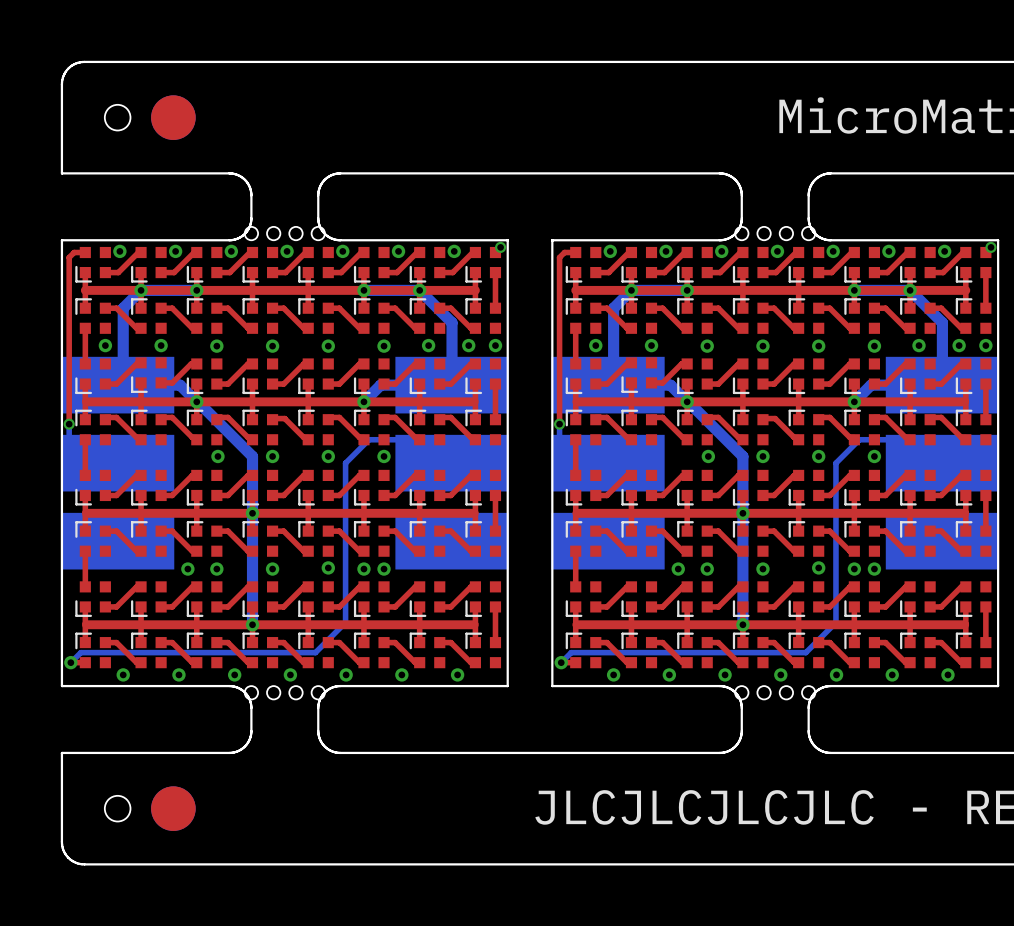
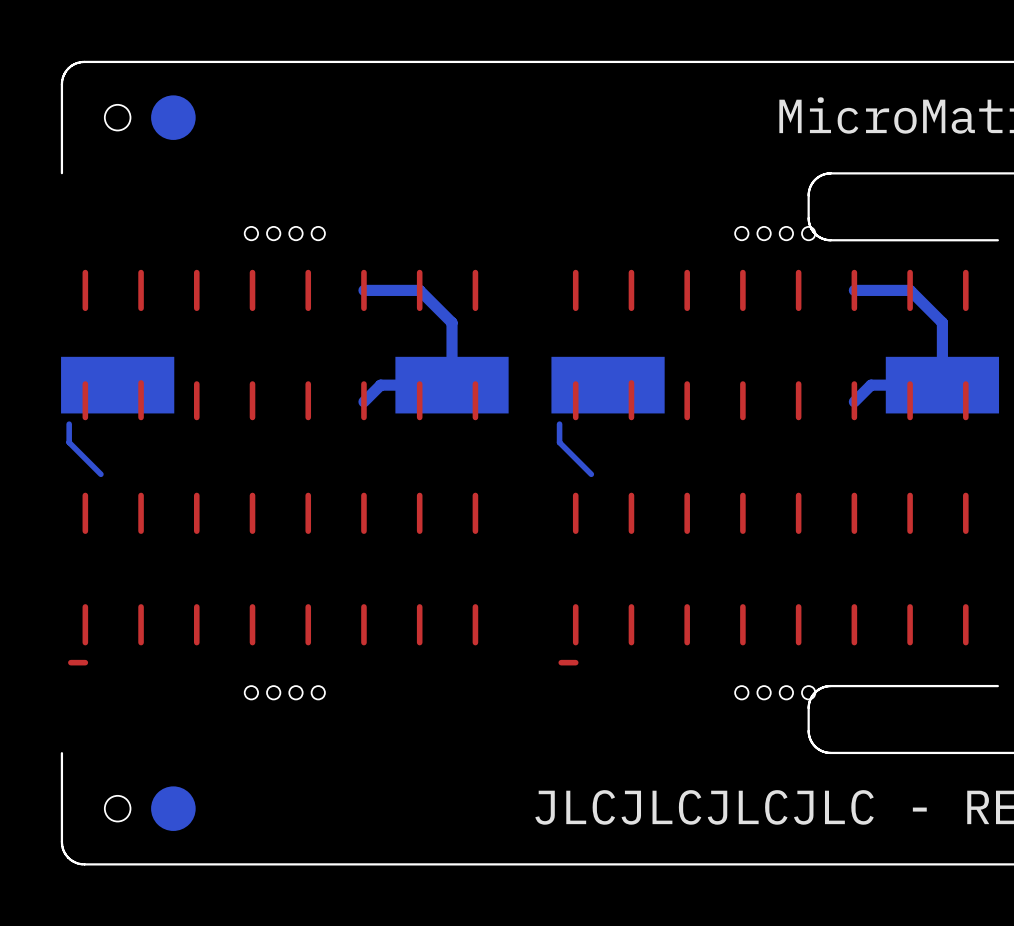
part: (173, 117) -> none
board edge: (62, 173) (231, 173) (245, 180) (251, 195) (250, 225) (244, 234) (234, 239) (62, 240) -> none
board edge: (61, 240) (61, 685) -> none
board edge: (507, 240) (334, 239) (325, 234) (319, 224) (318, 190) (327, 177) (340, 173) (720, 173) (733, 178) (741, 190) (740, 224) (734, 234) (725, 239) (552, 240) -> none
board edge: (507, 240) (507, 685) -> none
board edge: (552, 240) (552, 685) -> none
board edge: (998, 240) (998, 685) -> none
via: (500, 247) -> none
via: (991, 247) -> none
via: (119, 251) -> none
via: (175, 251) -> none
via: (231, 251) -> none
via: (287, 251) -> none
via: (342, 251) -> none
via: (398, 251) -> none
via: (454, 251) -> none
via: (610, 251) -> none
via: (666, 251) -> none
via: (721, 251) -> none
via: (777, 251) -> none
via: (833, 251) -> none
via: (888, 251) -> none
via: (944, 251) -> none
top track: (85, 252) (74, 252) (69, 257) (69, 424) -> none
top track: (141, 252) (138, 252) (118, 272) (105, 272) -> none
top track: (196, 252) (194, 252) (174, 272) (161, 272) -> none
top track: (252, 252) (249, 252) (229, 272) (216, 272) -> none
top track: (308, 252) (305, 252) (285, 272) (272, 272) -> none
top track: (363, 252) (361, 252) (341, 272) (328, 272) -> none
top track: (419, 252) (417, 252) (397, 272) (384, 272) -> none
top track: (475, 252) (472, 252) (452, 272) (439, 272) -> none
top track: (575, 252) (564, 252) (559, 257) (559, 424) -> none
top track: (631, 252) (628, 252) (608, 272) (595, 272) -> none
top track: (687, 252) (684, 252) (664, 272) (651, 272) -> none
top track: (742, 252) (740, 252) (720, 272) (707, 272) -> none
top track: (798, 252) (796, 252) (775, 272) (762, 272) -> none
top track: (854, 252) (851, 252) (831, 272) (818, 272) -> none
top track: (910, 252) (907, 252) (887, 272) (874, 272) -> none
top track: (965, 252) (963, 252) (943, 272) (930, 272) -> none
part: (93, 264) -> none
part: (148, 264) -> none
part: (204, 264) -> none
part: (260, 264) -> none
part: (316, 264) -> none
part: (371, 264) -> none
part: (427, 264) -> none
part: (483, 264) -> none
part: (583, 264) -> none
part: (639, 264) -> none
part: (694, 264) -> none
part: (750, 264) -> none
part: (806, 264) -> none
part: (862, 264) -> none
part: (917, 264) -> none
part: (973, 264) -> none
top track: (495, 272) (495, 308) -> none
top track: (985, 272) (985, 308) -> none
top track: (85, 290) (475, 290) -> none
via: (141, 290) -> none
bottom track: (196, 290) (141, 290) (123, 308) (123, 379) (117, 385) (180, 385) (252, 456) (252, 624) -> none
via: (196, 290) -> none
via: (363, 290) -> none
via: (419, 290) -> none
top track: (575, 290) (965, 290) -> none
via: (631, 290) -> none
bottom track: (687, 290) (631, 290) (613, 308) (613, 379) (608, 385) (670, 385) (742, 456) (742, 624) -> none
via: (687, 290) -> none
via: (854, 290) -> none
via: (910, 290) -> none
top track: (105, 308) (116, 308) (136, 328) (141, 328) -> none
top track: (161, 308) (172, 308) (192, 328) (196, 328) -> none
top track: (216, 308) (227, 308) (248, 328) (252, 328) -> none
top track: (272, 308) (283, 308) (303, 328) (308, 328) -> none
top track: (328, 308) (339, 308) (359, 328) (363, 328) -> none
top track: (384, 308) (395, 308) (415, 328) (419, 328) -> none
top track: (439, 308) (450, 308) (470, 328) (475, 328) -> none
top track: (595, 308) (606, 308) (626, 328) (631, 328) -> none
top track: (651, 308) (662, 308) (682, 328) (687, 328) -> none
top track: (707, 308) (718, 308) (738, 328) (742, 328) -> none
top track: (762, 308) (774, 308) (794, 328) (798, 328) -> none
top track: (818, 308) (829, 308) (849, 328) (854, 328) -> none
top track: (874, 308) (885, 308) (905, 328) (910, 328) -> none
top track: (930, 308) (941, 308) (961, 328) (965, 328) -> none
part: (93, 316) -> none
part: (148, 316) -> none
part: (204, 316) -> none
part: (260, 316) -> none
part: (316, 316) -> none
part: (371, 316) -> none
part: (427, 316) -> none
part: (483, 316) -> none
part: (583, 316) -> none
part: (639, 316) -> none
part: (694, 316) -> none
part: (750, 316) -> none
part: (806, 316) -> none
part: (862, 316) -> none
part: (917, 316) -> none
part: (973, 316) -> none
top track: (85, 328) (85, 363) -> none
top track: (575, 328) (575, 363) -> none
via: (105, 345) -> none
via: (161, 345) -> none
via: (428, 345) -> none
via: (468, 345) -> none
via: (495, 345) -> none
via: (595, 345) -> none
via: (651, 345) -> none
via: (919, 345) -> none
via: (959, 345) -> none
via: (985, 345) -> none
via: (216, 346) -> none
via: (272, 346) -> none
via: (328, 346) -> none
via: (384, 346) -> none
via: (707, 346) -> none
via: (762, 346) -> none
via: (818, 346) -> none
via: (874, 346) -> none
top track: (141, 362) (137, 362) (116, 384) (105, 384) -> none
top track: (631, 362) (628, 362) (606, 384) (595, 384) -> none
top track: (196, 363) (191, 363) (172, 382) (161, 382) -> none
top track: (252, 363) (248, 363) (227, 384) (216, 384) -> none
top track: (308, 363) (303, 363) (283, 384) (272, 384) -> none
top track: (363, 363) (359, 363) (339, 384) (328, 384) -> none
top track: (419, 363) (415, 363) (395, 384) (384, 384) -> none
top track: (475, 363) (470, 363) (450, 384) (439, 384) -> none
top track: (687, 363) (681, 363) (662, 382) (651, 382) -> none
top track: (742, 363) (738, 363) (718, 384) (707, 384) -> none
top track: (798, 363) (794, 363) (774, 384) (762, 384) -> none
top track: (854, 363) (849, 363) (829, 384) (818, 384) -> none
top track: (910, 363) (905, 363) (885, 384) (874, 384) -> none
top track: (965, 363) (961, 363) (941, 384) (930, 384) -> none
part: (148, 375) -> none
part: (639, 375) -> none
part: (93, 376) -> none
part: (204, 376) -> none
part: (260, 376) -> none
part: (316, 376) -> none
part: (371, 376) -> none
part: (427, 376) -> none
part: (483, 376) -> none
part: (583, 376) -> none
part: (694, 376) -> none
part: (750, 376) -> none
part: (806, 376) -> none
part: (862, 376) -> none
part: (917, 376) -> none
part: (973, 376) -> none
top track: (495, 384) (495, 417) -> none
top track: (985, 384) (985, 417) -> none
top track: (86, 401) (474, 401) -> none
via: (196, 401) -> none
via: (363, 401) -> none
top track: (576, 401) (964, 401) -> none
via: (687, 401) -> none
via: (854, 401) -> none
top track: (105, 417) (116, 417) (136, 437) (141, 437) -> none
top track: (161, 417) (172, 417) (192, 437) (196, 437) -> none
top track: (216, 417) (227, 417) (248, 437) (252, 437) -> none
top track: (328, 417) (339, 417) (359, 437) (363, 437) -> none
top track: (384, 417) (395, 417) (415, 437) (419, 437) -> none
top track: (439, 417) (450, 417) (470, 437) (475, 437) -> none
top track: (595, 417) (606, 417) (626, 437) (631, 437) -> none
top track: (651, 417) (662, 417) (682, 437) (687, 437) -> none
top track: (707, 417) (718, 417) (738, 437) (742, 437) -> none
top track: (818, 417) (829, 417) (849, 437) (854, 437) -> none
top track: (874, 417) (885, 417) (905, 437) (910, 437) -> none
top track: (930, 417) (941, 417) (961, 437) (965, 437) -> none
top track: (273, 418) (284, 418) (303, 437) (308, 437) -> none
top track: (764, 418) (775, 418) (794, 437) (798, 437) -> none
via: (69, 424) -> none
via: (559, 424) -> none
part: (93, 427) -> none
part: (148, 427) -> none
part: (204, 427) -> none
part: (260, 427) -> none
part: (316, 427) -> none
part: (371, 427) -> none
part: (427, 427) -> none
part: (483, 427) -> none
part: (583, 427) -> none
part: (639, 427) -> none
part: (694, 427) -> none
part: (750, 427) -> none
part: (806, 427) -> none
part: (862, 427) -> none
part: (917, 427) -> none
part: (973, 427) -> none
top track: (85, 437) (85, 475) -> none
top track: (575, 437) (575, 475) -> none
via: (217, 456) -> none
via: (272, 456) -> none
via: (328, 456) -> none
via: (384, 456) -> none
via: (708, 456) -> none
via: (762, 456) -> none
via: (818, 456) -> none
via: (874, 456) -> none
part: (117, 463) -> none
bottom track: (452, 463) (428, 439) (368, 439) (345, 463) (345, 622) (315, 652) (80, 652) (70, 662) -> none
part: (452, 463) -> none
part: (608, 463) -> none
bottom track: (942, 463) (919, 439) (859, 439) (835, 463) (835, 622) (805, 652) (571, 652) (561, 662) -> none
part: (942, 463) -> none
top track: (141, 475) (136, 475) (116, 495) (105, 495) -> none
top track: (196, 475) (192, 475) (172, 495) (161, 495) -> none
top track: (252, 475) (248, 475) (227, 495) (216, 495) -> none
top track: (308, 475) (303, 475) (283, 495) (272, 495) -> none
top track: (363, 475) (359, 475) (339, 495) (328, 495) -> none
top track: (419, 475) (415, 475) (395, 495) (384, 495) -> none
top track: (475, 475) (470, 475) (450, 495) (439, 495) -> none
top track: (631, 475) (626, 475) (606, 495) (595, 495) -> none
top track: (687, 475) (682, 475) (662, 495) (651, 495) -> none
top track: (742, 475) (738, 475) (718, 495) (707, 495) -> none
top track: (798, 475) (794, 475) (774, 495) (762, 495) -> none
top track: (854, 475) (849, 475) (829, 495) (818, 495) -> none
top track: (910, 475) (905, 475) (885, 495) (874, 495) -> none
top track: (965, 475) (961, 475) (941, 495) (930, 495) -> none
part: (93, 487) -> none
part: (148, 487) -> none
part: (204, 487) -> none
part: (260, 487) -> none
part: (316, 487) -> none
part: (371, 487) -> none
part: (427, 487) -> none
part: (483, 487) -> none
part: (583, 487) -> none
part: (639, 487) -> none
part: (694, 487) -> none
part: (750, 487) -> none
part: (806, 487) -> none
part: (862, 487) -> none
part: (917, 487) -> none
part: (973, 487) -> none
top track: (495, 495) (495, 531) -> none
top track: (985, 495) (985, 531) -> none
top track: (86, 513) (474, 513) -> none
via: (252, 513) -> none
top track: (576, 513) (964, 513) -> none
via: (742, 513) -> none
top track: (105, 531) (116, 531) (136, 551) (141, 551) -> none
top track: (161, 531) (172, 531) (192, 551) (196, 551) -> none
top track: (216, 531) (227, 531) (248, 551) (252, 551) -> none
top track: (272, 531) (283, 531) (303, 551) (308, 551) -> none
top track: (328, 531) (339, 531) (359, 551) (363, 551) -> none
top track: (384, 531) (395, 531) (415, 551) (419, 551) -> none
top track: (439, 531) (450, 531) (470, 551) (475, 551) -> none
top track: (595, 531) (606, 531) (626, 551) (631, 551) -> none
top track: (651, 531) (662, 531) (682, 551) (687, 551) -> none
top track: (707, 531) (718, 531) (738, 551) (742, 551) -> none
top track: (762, 531) (774, 531) (794, 551) (798, 551) -> none
top track: (818, 531) (829, 531) (849, 551) (854, 551) -> none
top track: (874, 531) (885, 531) (905, 551) (910, 551) -> none
top track: (930, 531) (941, 531) (961, 551) (965, 551) -> none
part: (93, 538) -> none
part: (148, 538) -> none
part: (204, 538) -> none
part: (260, 538) -> none
part: (316, 538) -> none
part: (371, 538) -> none
part: (427, 538) -> none
part: (483, 538) -> none
part: (583, 538) -> none
part: (639, 538) -> none
part: (694, 538) -> none
part: (750, 538) -> none
part: (806, 538) -> none
part: (862, 538) -> none
part: (917, 538) -> none
part: (973, 538) -> none
part: (117, 541) -> none
part: (452, 541) -> none
part: (608, 541) -> none
part: (942, 541) -> none
top track: (85, 551) (85, 586) -> none
top track: (575, 551) (575, 586) -> none
via: (328, 567) -> none
via: (818, 567) -> none
via: (187, 569) -> none
via: (216, 569) -> none
via: (272, 569) -> none
via: (363, 569) -> none
via: (384, 569) -> none
via: (678, 569) -> none
via: (707, 569) -> none
via: (762, 569) -> none
via: (854, 569) -> none
via: (874, 569) -> none
top track: (141, 586) (136, 586) (116, 606) (105, 606) -> none
top track: (196, 586) (192, 586) (172, 606) (161, 606) -> none
top track: (252, 586) (248, 586) (227, 606) (216, 606) -> none
top track: (308, 586) (303, 586) (283, 606) (272, 606) -> none
top track: (363, 586) (359, 586) (339, 606) (328, 606) -> none
top track: (419, 586) (415, 586) (395, 606) (384, 606) -> none
top track: (475, 586) (470, 586) (450, 606) (439, 606) -> none
top track: (631, 586) (626, 586) (606, 606) (595, 606) -> none
top track: (687, 586) (682, 586) (662, 606) (651, 606) -> none
top track: (742, 586) (738, 586) (718, 606) (707, 606) -> none
top track: (798, 586) (794, 586) (774, 606) (762, 606) -> none
top track: (854, 586) (849, 586) (829, 606) (818, 606) -> none
top track: (910, 586) (905, 586) (885, 606) (874, 606) -> none
top track: (965, 586) (961, 586) (941, 606) (930, 606) -> none
part: (93, 599) -> none
part: (148, 599) -> none
part: (204, 599) -> none
part: (260, 599) -> none
part: (316, 599) -> none
part: (371, 599) -> none
part: (427, 599) -> none
part: (483, 599) -> none
part: (583, 599) -> none
part: (639, 599) -> none
part: (694, 599) -> none
part: (750, 599) -> none
part: (806, 599) -> none
part: (862, 599) -> none
part: (917, 599) -> none
part: (973, 599) -> none
top track: (495, 606) (495, 642) -> none
top track: (985, 606) (985, 642) -> none
top track: (86, 624) (474, 624) -> none
via: (252, 624) -> none
top track: (576, 624) (964, 624) -> none
via: (742, 624) -> none
top track: (105, 642) (116, 642) (136, 662) (141, 662) -> none
top track: (161, 642) (172, 642) (192, 662) (196, 662) -> none
top track: (216, 642) (227, 642) (248, 662) (252, 662) -> none
top track: (272, 642) (283, 642) (303, 662) (308, 662) -> none
top track: (328, 642) (339, 642) (359, 662) (363, 662) -> none
top track: (384, 642) (395, 642) (415, 662) (419, 662) -> none
top track: (439, 642) (450, 642) (470, 662) (475, 662) -> none
top track: (595, 642) (606, 642) (626, 662) (631, 662) -> none
top track: (651, 642) (662, 642) (682, 662) (687, 662) -> none
top track: (707, 642) (718, 642) (738, 662) (742, 662) -> none
top track: (762, 642) (774, 642) (794, 662) (798, 662) -> none
top track: (818, 642) (829, 642) (849, 662) (854, 662) -> none
top track: (874, 642) (885, 642) (905, 662) (910, 662) -> none
top track: (930, 642) (941, 642) (961, 662) (965, 662) -> none
part: (93, 650) -> none
part: (148, 650) -> none
part: (204, 650) -> none
part: (260, 650) -> none
part: (316, 650) -> none
part: (371, 650) -> none
part: (427, 650) -> none
part: (483, 650) -> none
part: (583, 650) -> none
part: (639, 650) -> none
part: (694, 650) -> none
part: (750, 650) -> none
part: (806, 650) -> none
part: (862, 650) -> none
part: (917, 650) -> none
part: (973, 650) -> none
via: (70, 662) -> none
via: (561, 662) -> none
via: (123, 674) -> none
via: (178, 674) -> none
via: (234, 674) -> none
via: (290, 674) -> none
via: (346, 674) -> none
via: (401, 674) -> none
via: (457, 674) -> none
via: (613, 674) -> none
via: (669, 674) -> none
via: (725, 674) -> none
via: (780, 674) -> none
via: (836, 674) -> none
via: (892, 674) -> none
via: (947, 674) -> none
board edge: (62, 686) (231, 686) (245, 693) (251, 708) (250, 738) (244, 747) (234, 752) (62, 752) -> none
board edge: (507, 686) (334, 686) (325, 691) (319, 701) (318, 736) (327, 748) (340, 752) (720, 752) (733, 747) (741, 736) (740, 701) (734, 691) (725, 686) (552, 686) -> none
part: (173, 808) -> none

